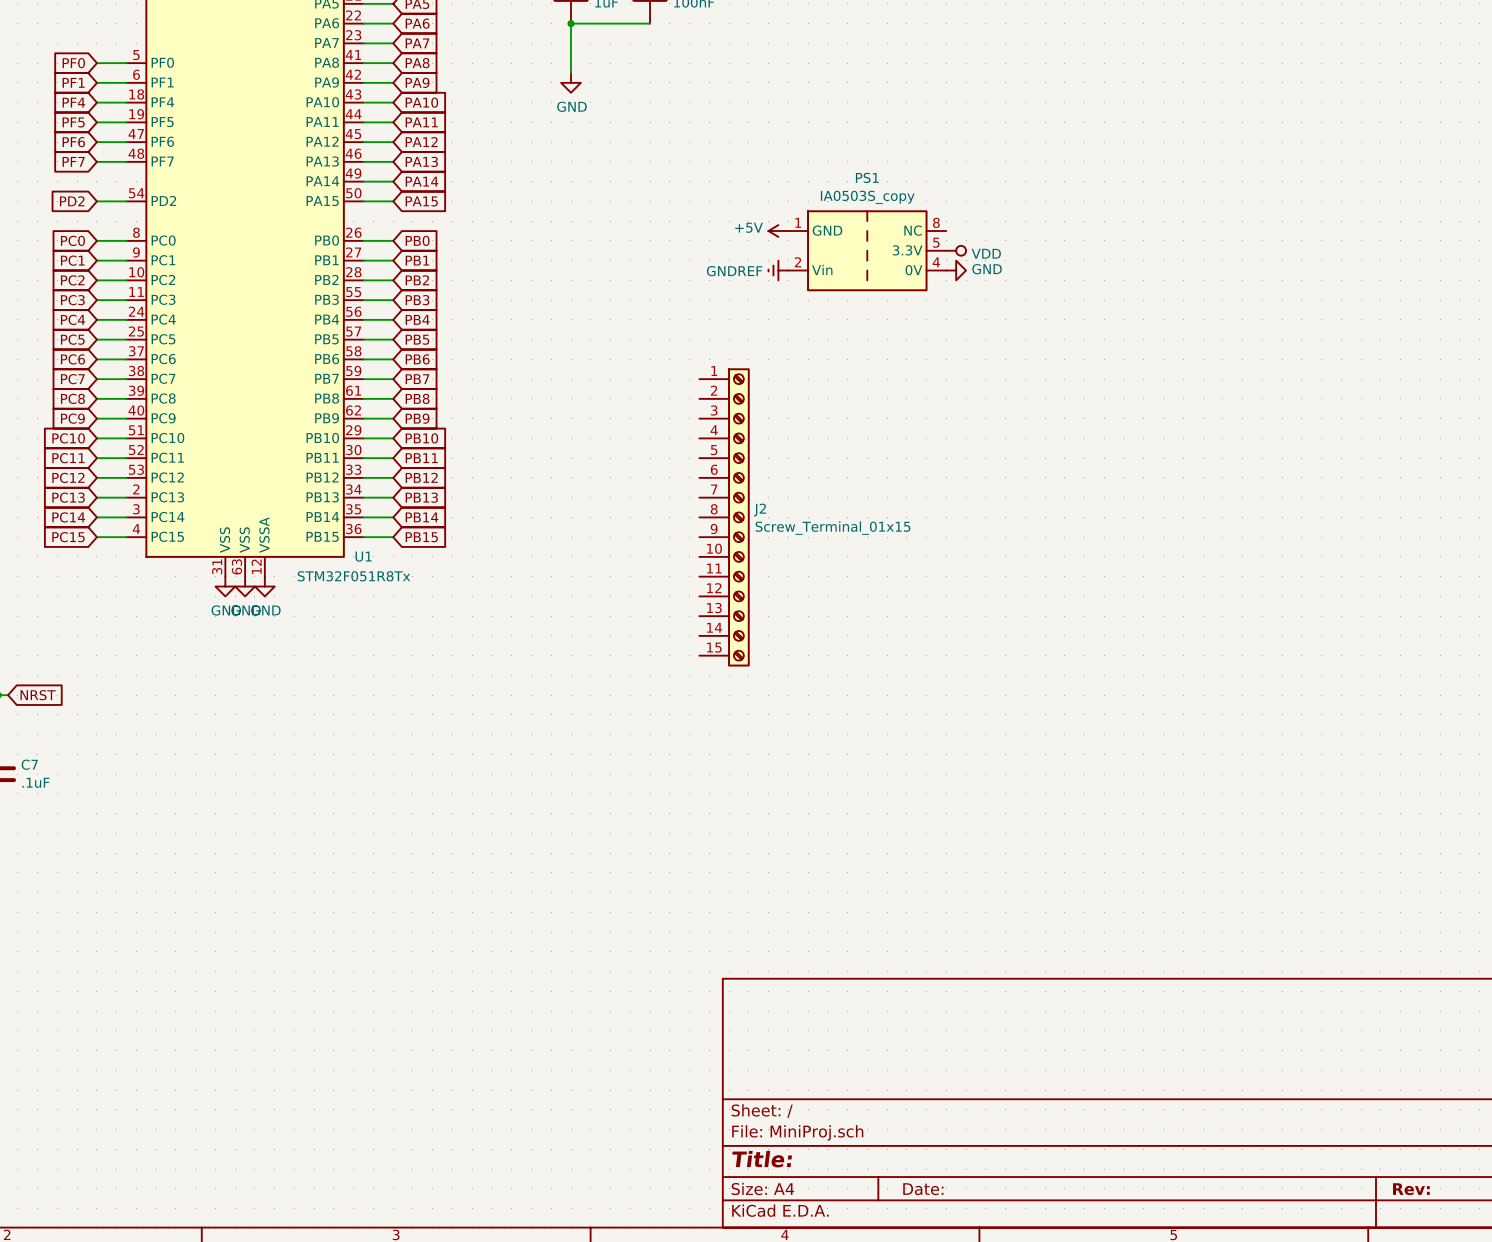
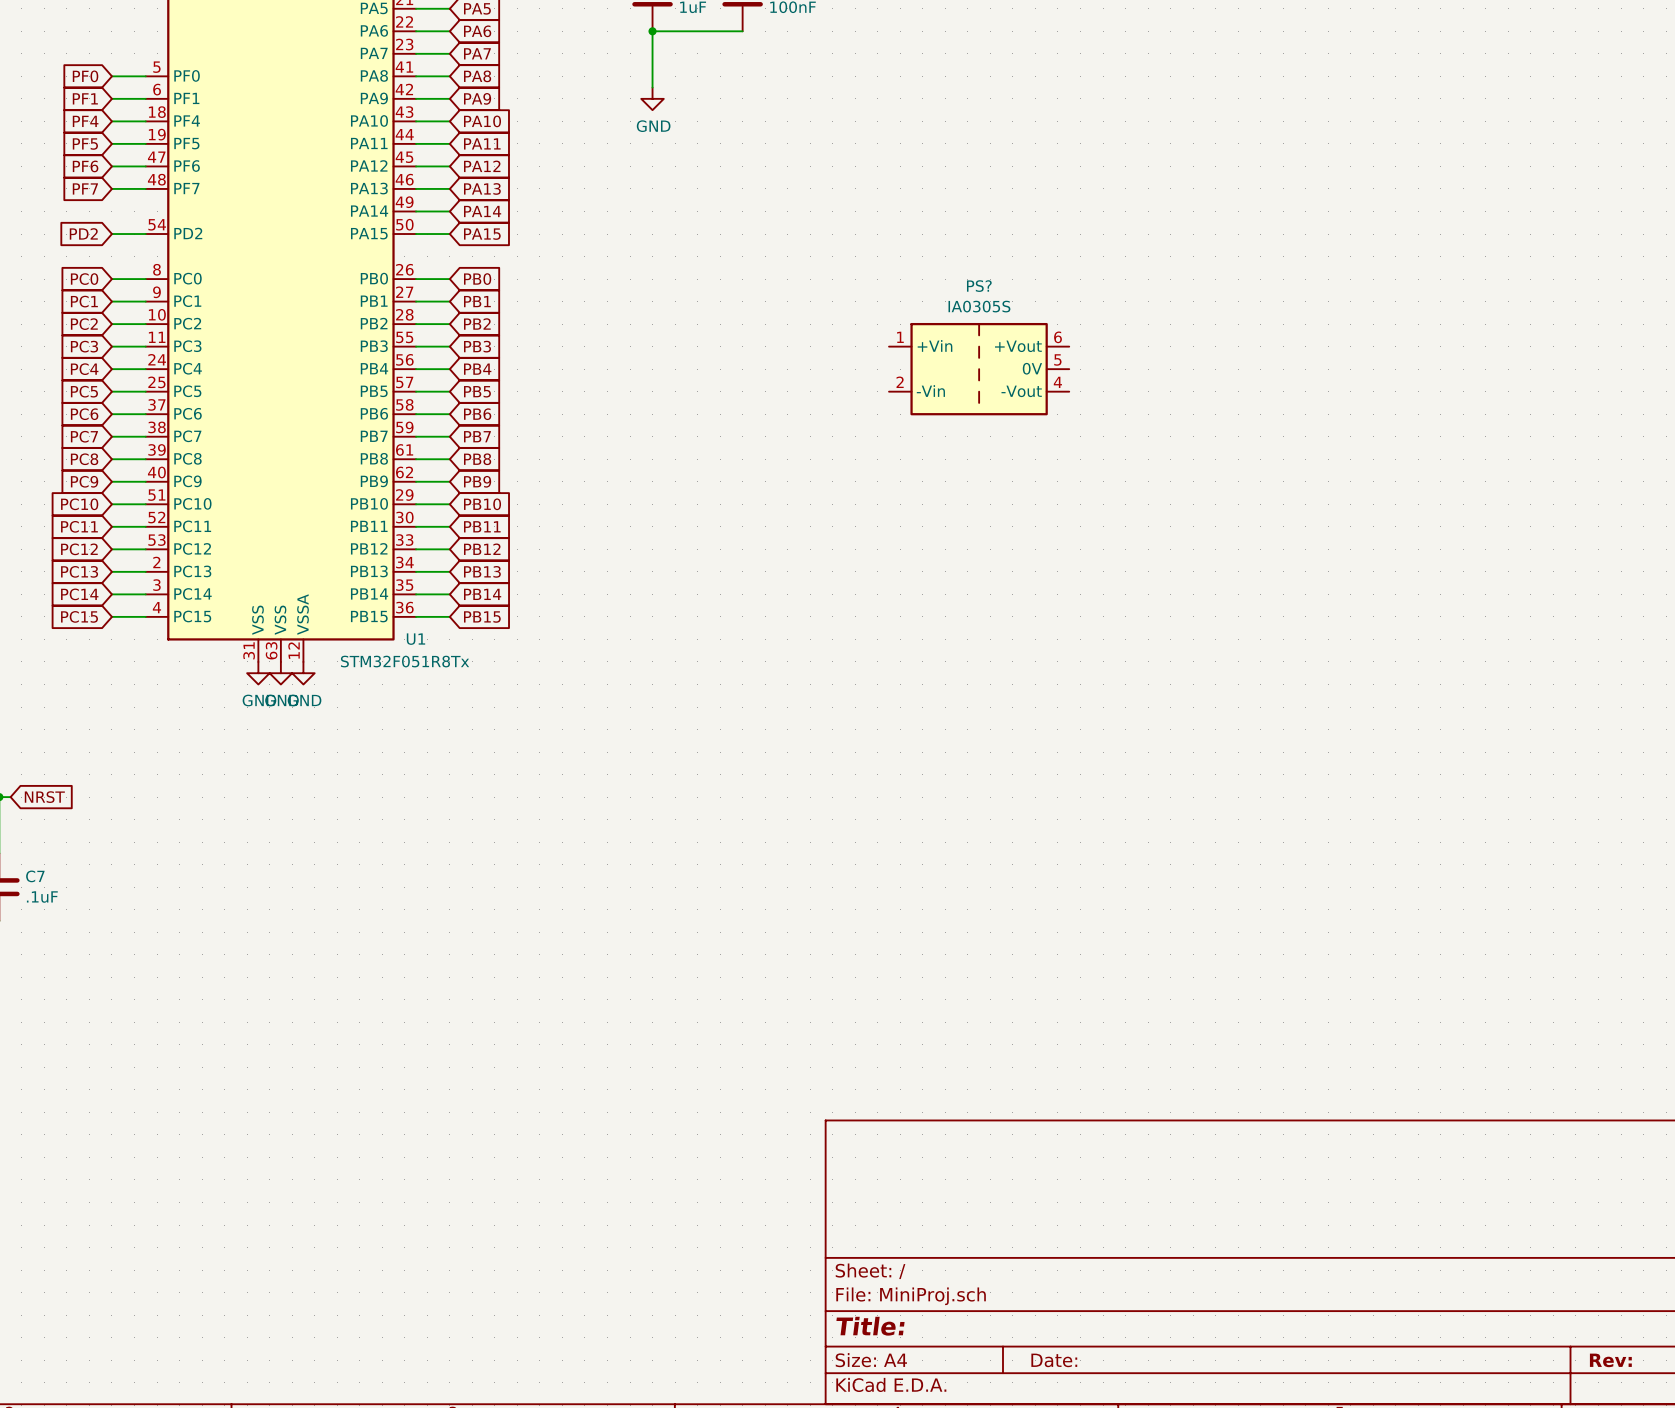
power symbol: +5V (778, 231) -> none
PS1: IA0503S_copy (867, 250) -> none
power symbol: VDD (956, 250) -> none
power symbol: GNDREF (778, 270) -> none
power symbol: GND (956, 270) -> none
PS?: none -> IA0305S (979, 369)
J2: Screw_Terminal_01x15 (724, 517) -> none

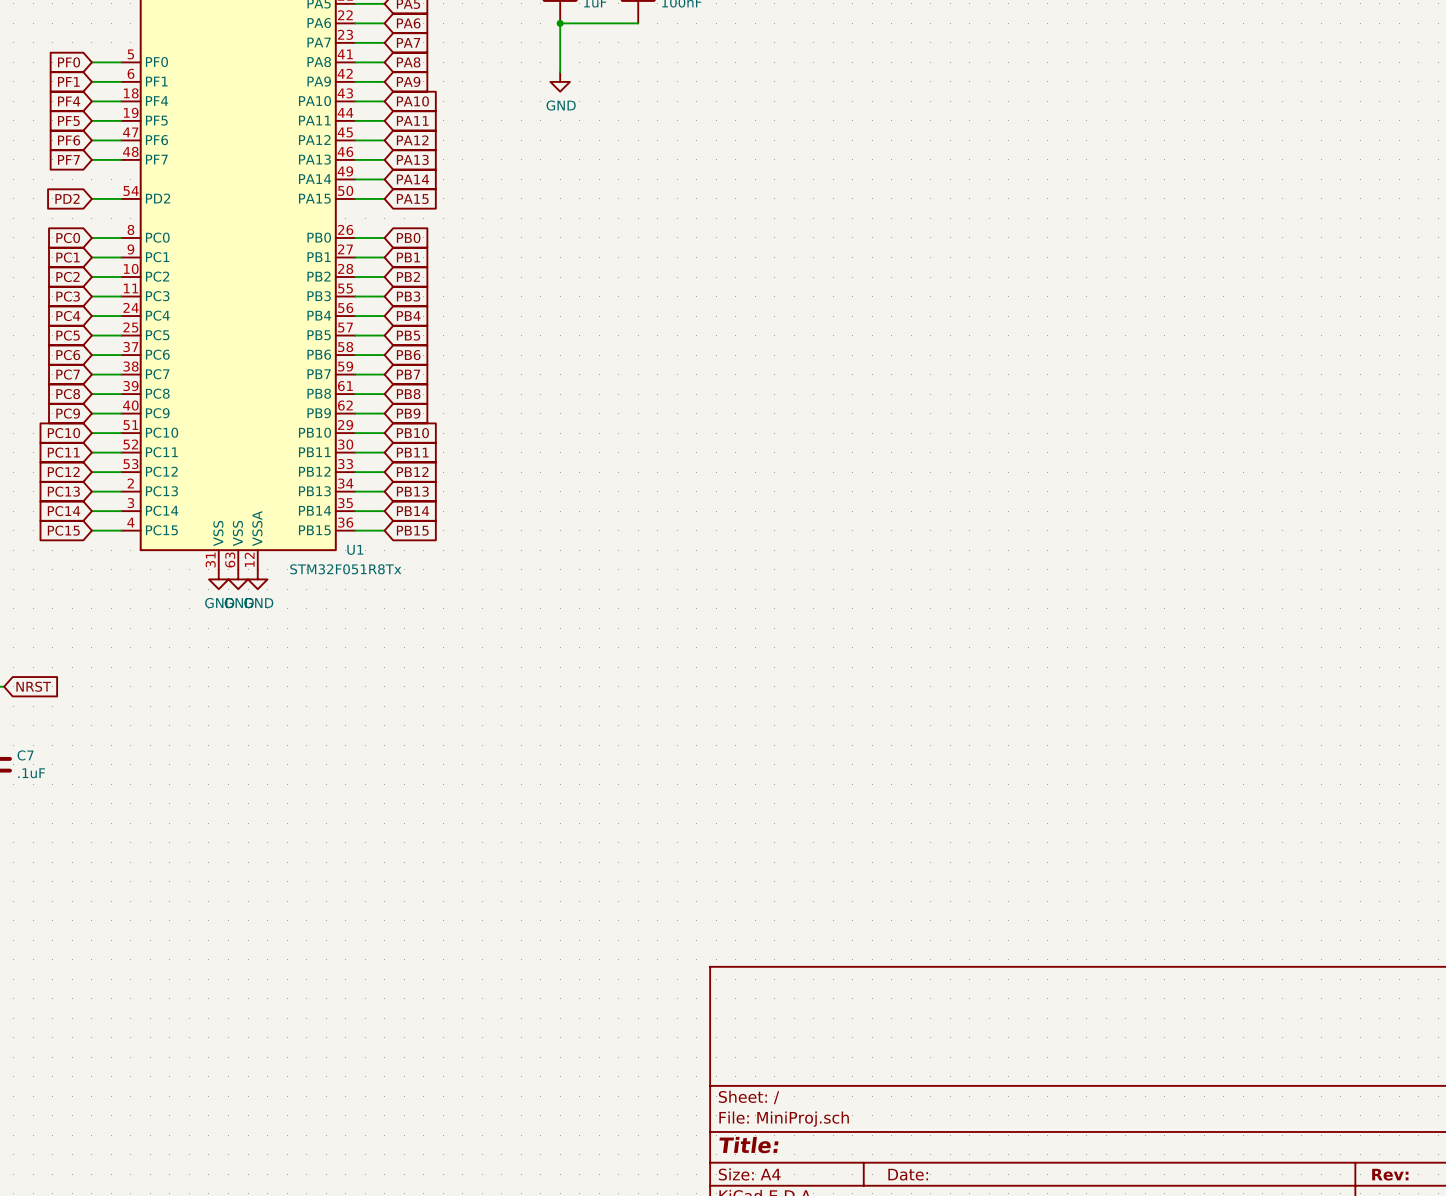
PS?: IA0305S (979, 369) -> none

